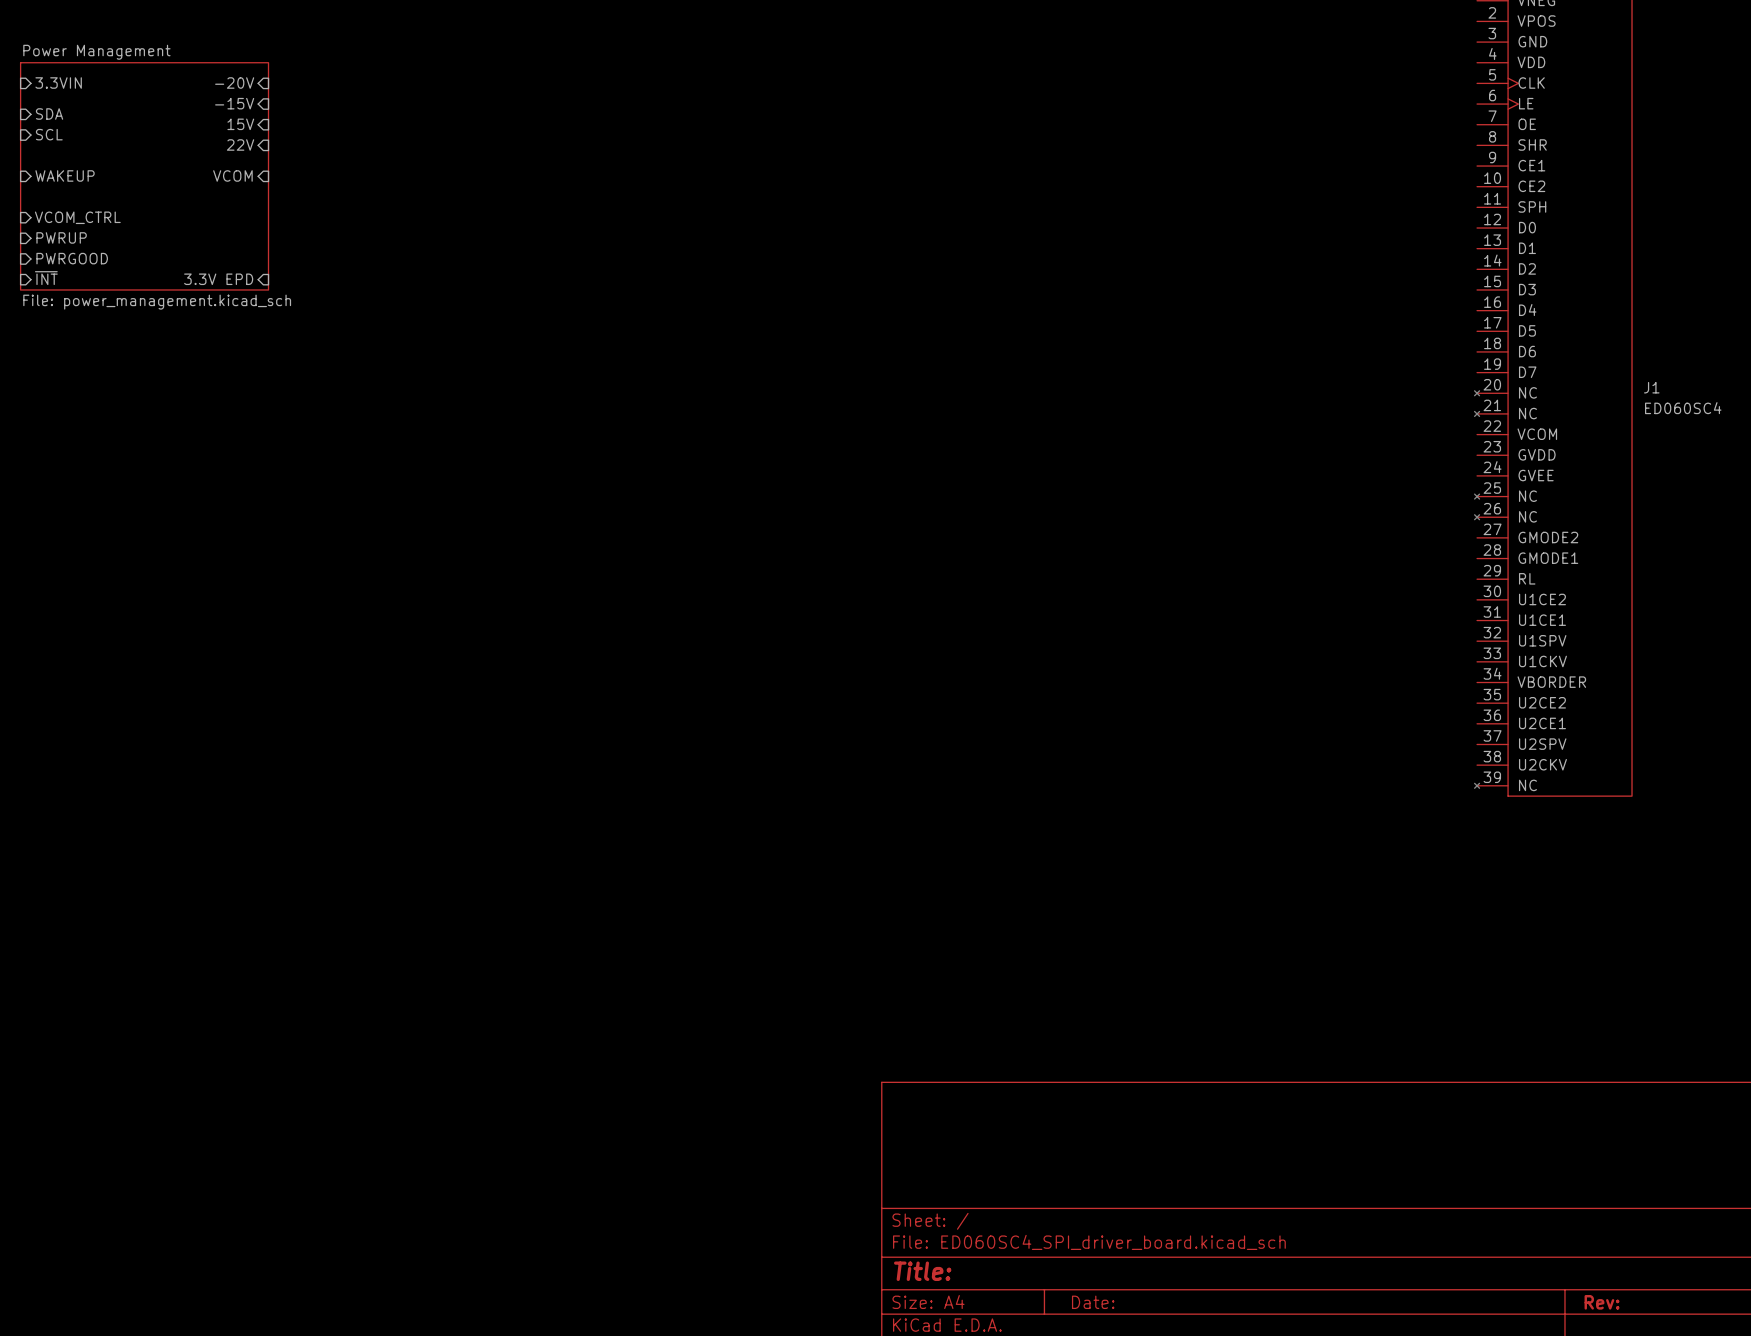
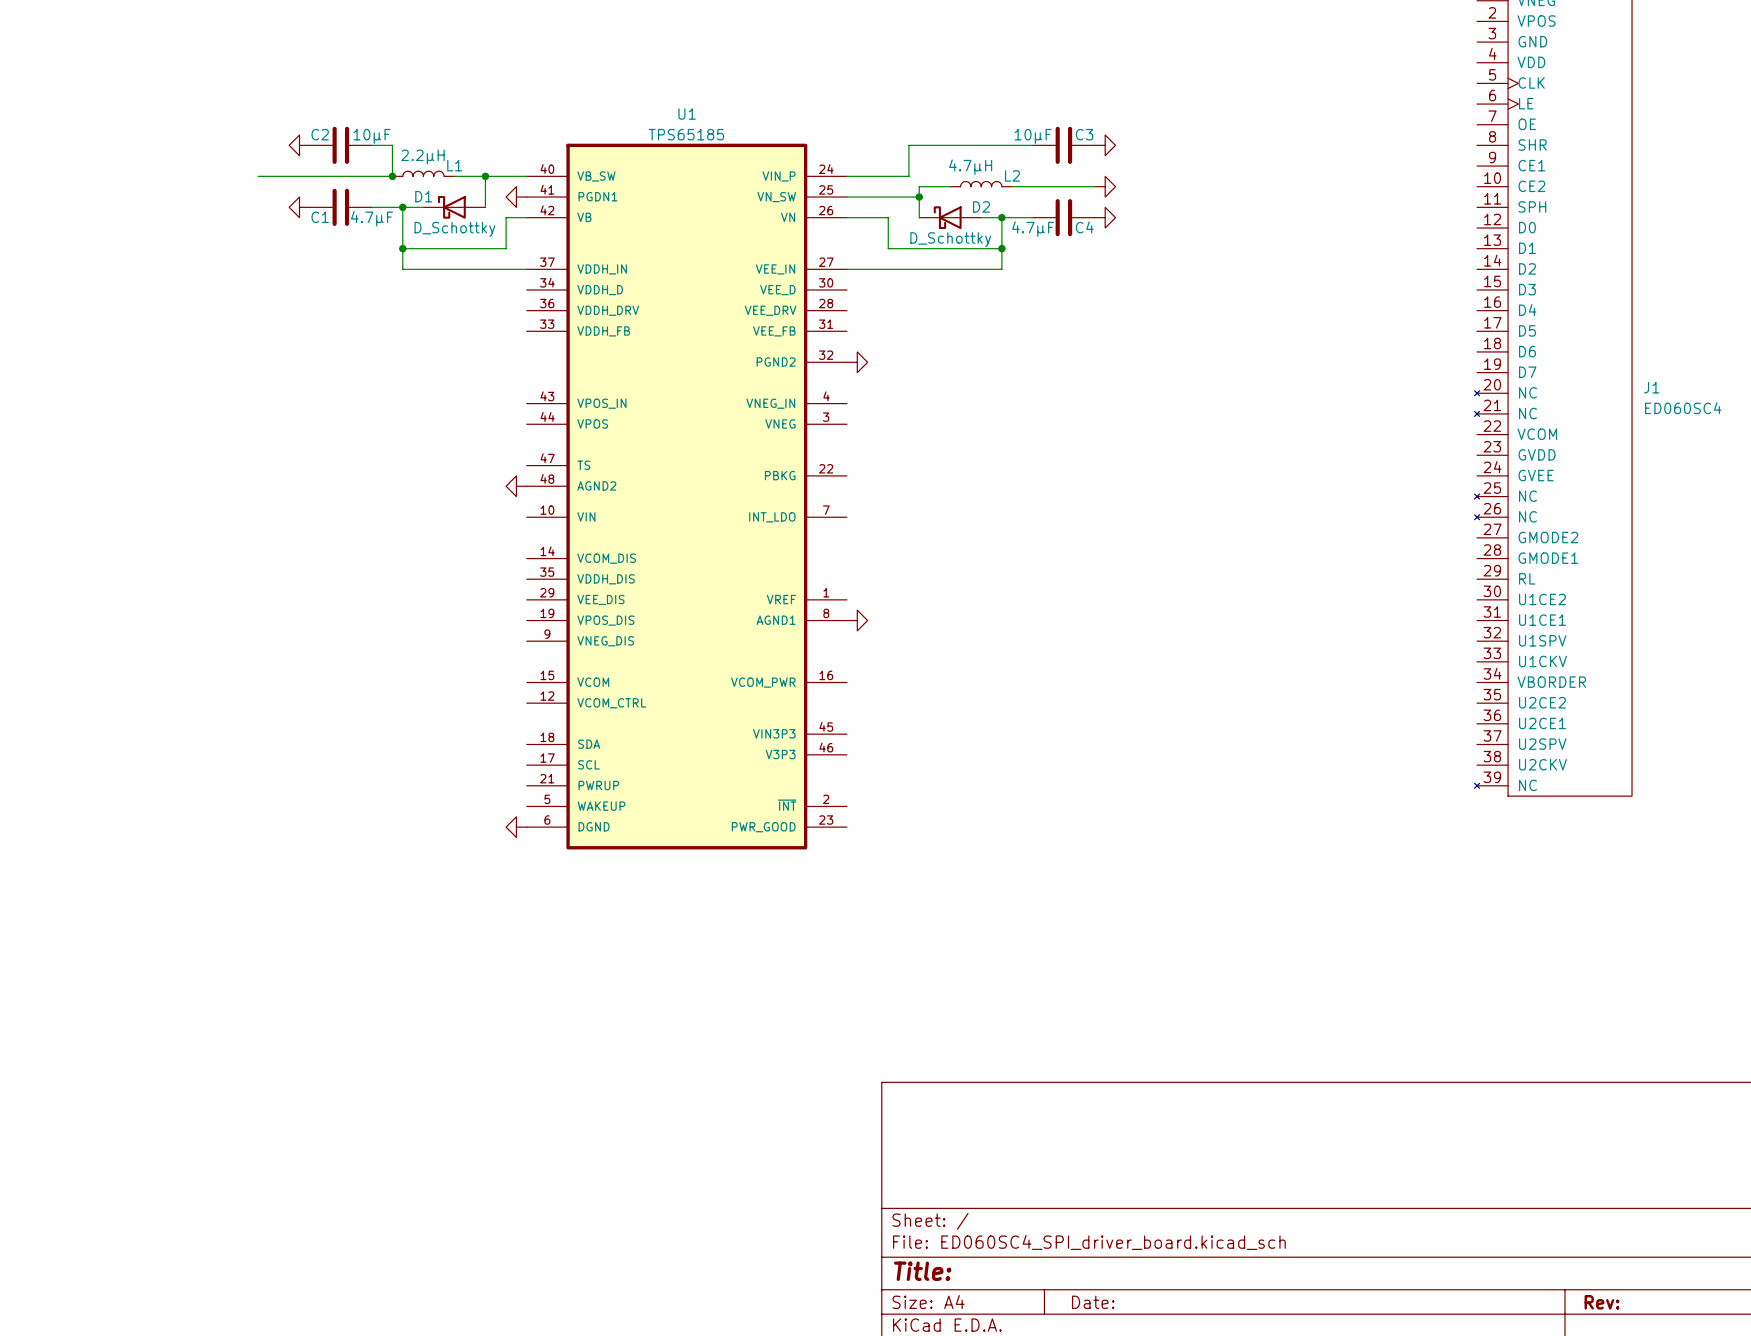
sheet pin: 3.3VIN (58, 83) -> none
sheet pin: -20V (234, 83) -> none
sheet pin: -15V (234, 103) -> none
sheet pin: SDA (49, 113) -> none
sheet pin: 15V (240, 124) -> none
sheet pin: SCL (49, 134) -> none
sheet pin: 22V (240, 144) -> none
power symbol: none -> (299, 145)
C2: none -> 10µF (340, 145)
wire: none -> (371, 145) (392, 145) (392, 176) (258, 176)
wire: none -> (1032, 145) (908, 145) (908, 176) (846, 176)
C3: none -> 10µF (1063, 145)
power symbol: none -> (1105, 145)
L1: none -> 2.2µH (423, 173)
sheet pin: WAKEUP (65, 175) -> none
sheet pin: VCOM (232, 175) -> none
sheet Power Management: File: power_management.kicad_sch (144, 176) -> none
junction: none -> (392, 176)
wire: none -> (454, 176) (526, 176)
wire: none -> (485, 176) (485, 207)
junction: none -> (485, 176)
L2: none -> 4.7µH (981, 184)
wire: none -> (950, 186) (919, 186) (919, 217)
wire: none -> (1012, 186) (1094, 186)
power symbol: none -> (1105, 186)
power symbol: none -> (516, 197)
wire: none -> (846, 197) (919, 197)
junction: none -> (919, 197)
power symbol: none -> (299, 207)
C1: none -> 4.7µF (340, 207)
wire: none -> (371, 207) (423, 207)
wire: none -> (402, 207) (402, 269) (526, 269)
junction: none -> (402, 207)
D1: none -> D_Schottky (454, 207)
sheet pin: VCOM_CTRL (77, 217) -> none
wire: none -> (526, 217) (506, 217) (506, 248) (402, 248)
wire: none -> (846, 217) (888, 217) (888, 248) (1001, 248)
D2: none -> D_Schottky (950, 217)
wire: none -> (981, 217) (1032, 217)
wire: none -> (1001, 217) (1001, 269) (846, 269)
junction: none -> (1001, 217)
C4: none -> 4.7µF (1063, 217)
power symbol: none -> (1105, 217)
sheet pin: PWRUP (61, 237) -> none
junction: none -> (402, 248)
junction: none -> (1001, 248)
sheet pin: PWRGOOD (72, 258) -> none
sheet pin: ~{INT} (46, 278) -> none
sheet pin: 3.3V EPD (218, 279) -> none
power symbol: none -> (857, 362)
power symbol: none -> (516, 486)
U1: none -> TPS65185 (686, 496)
power symbol: none -> (857, 620)
power symbol: none -> (516, 827)

